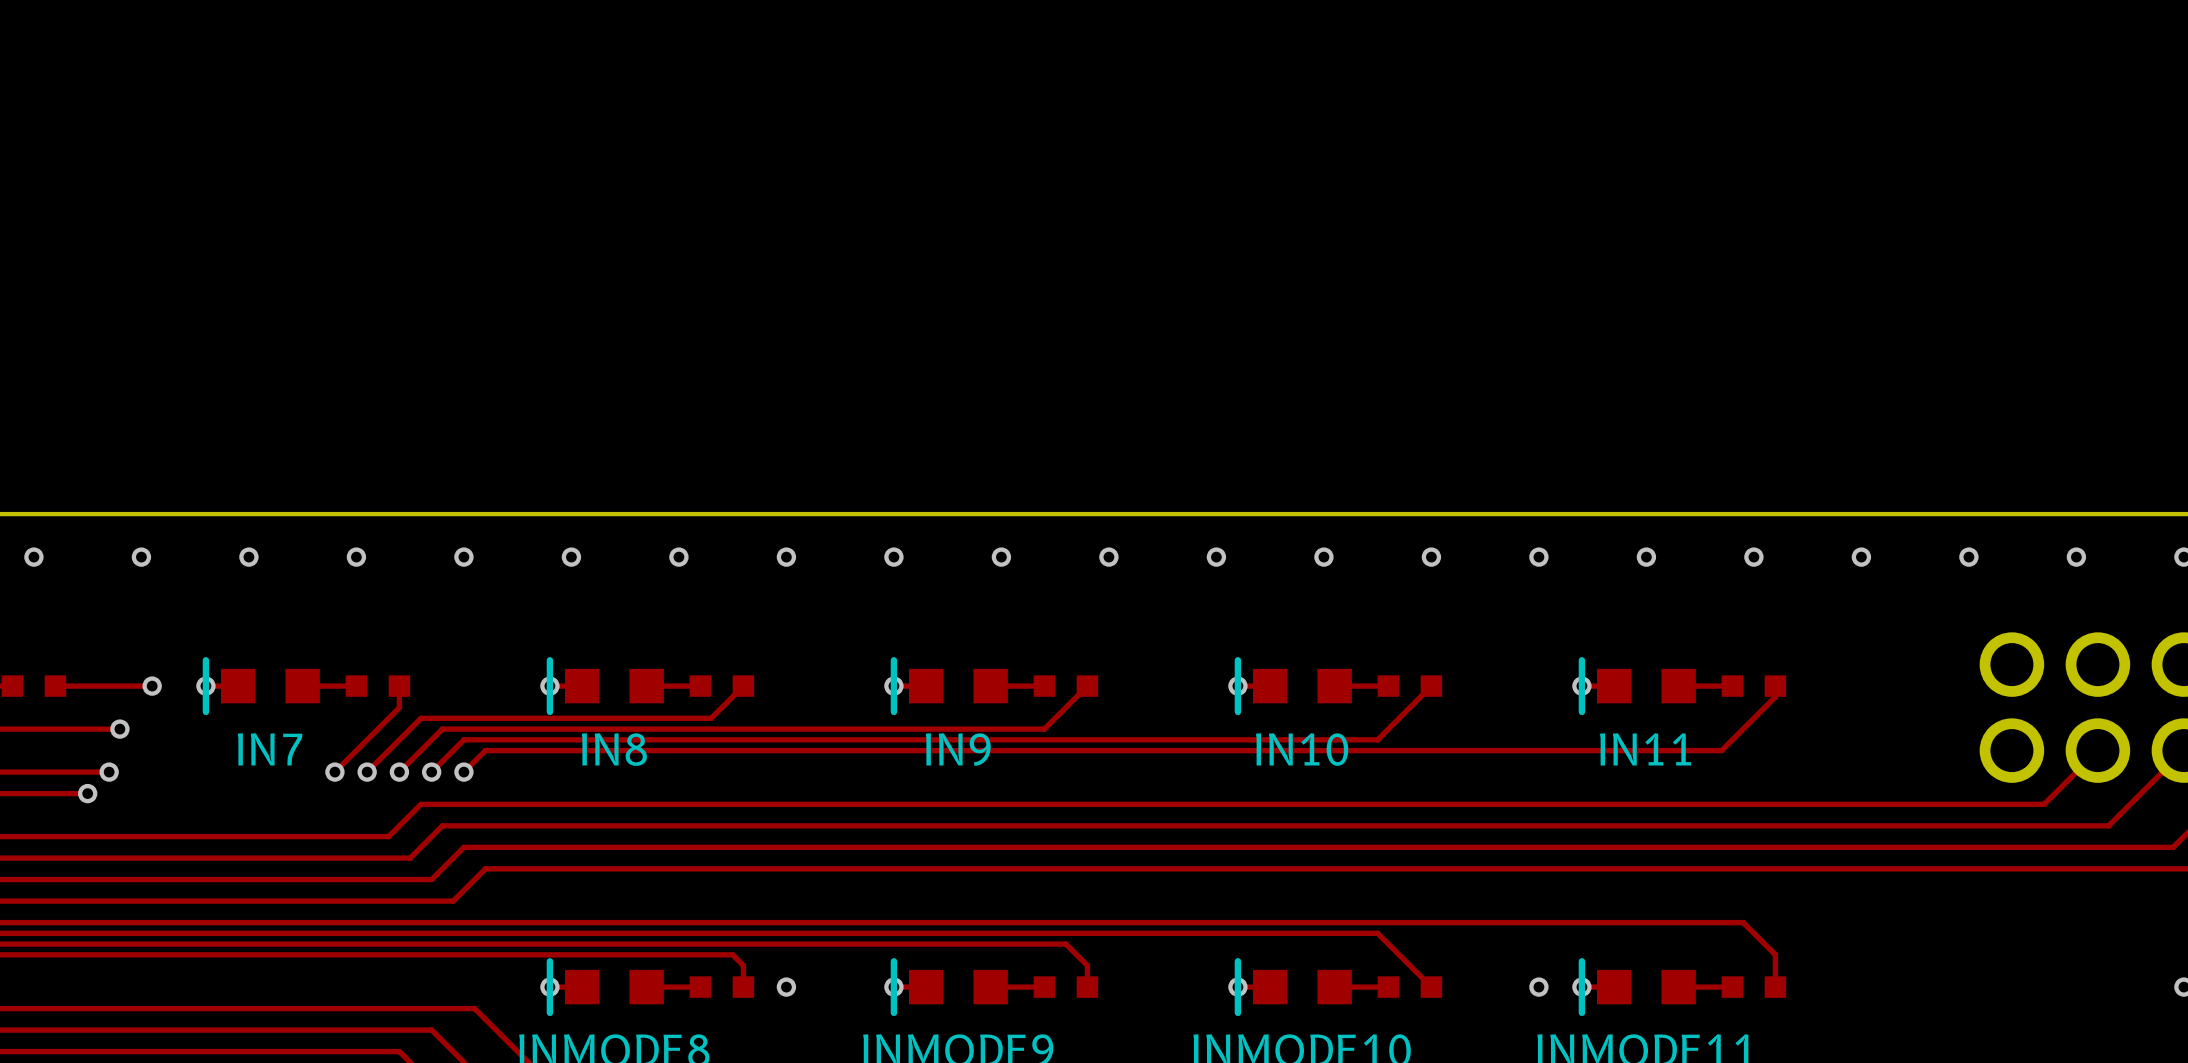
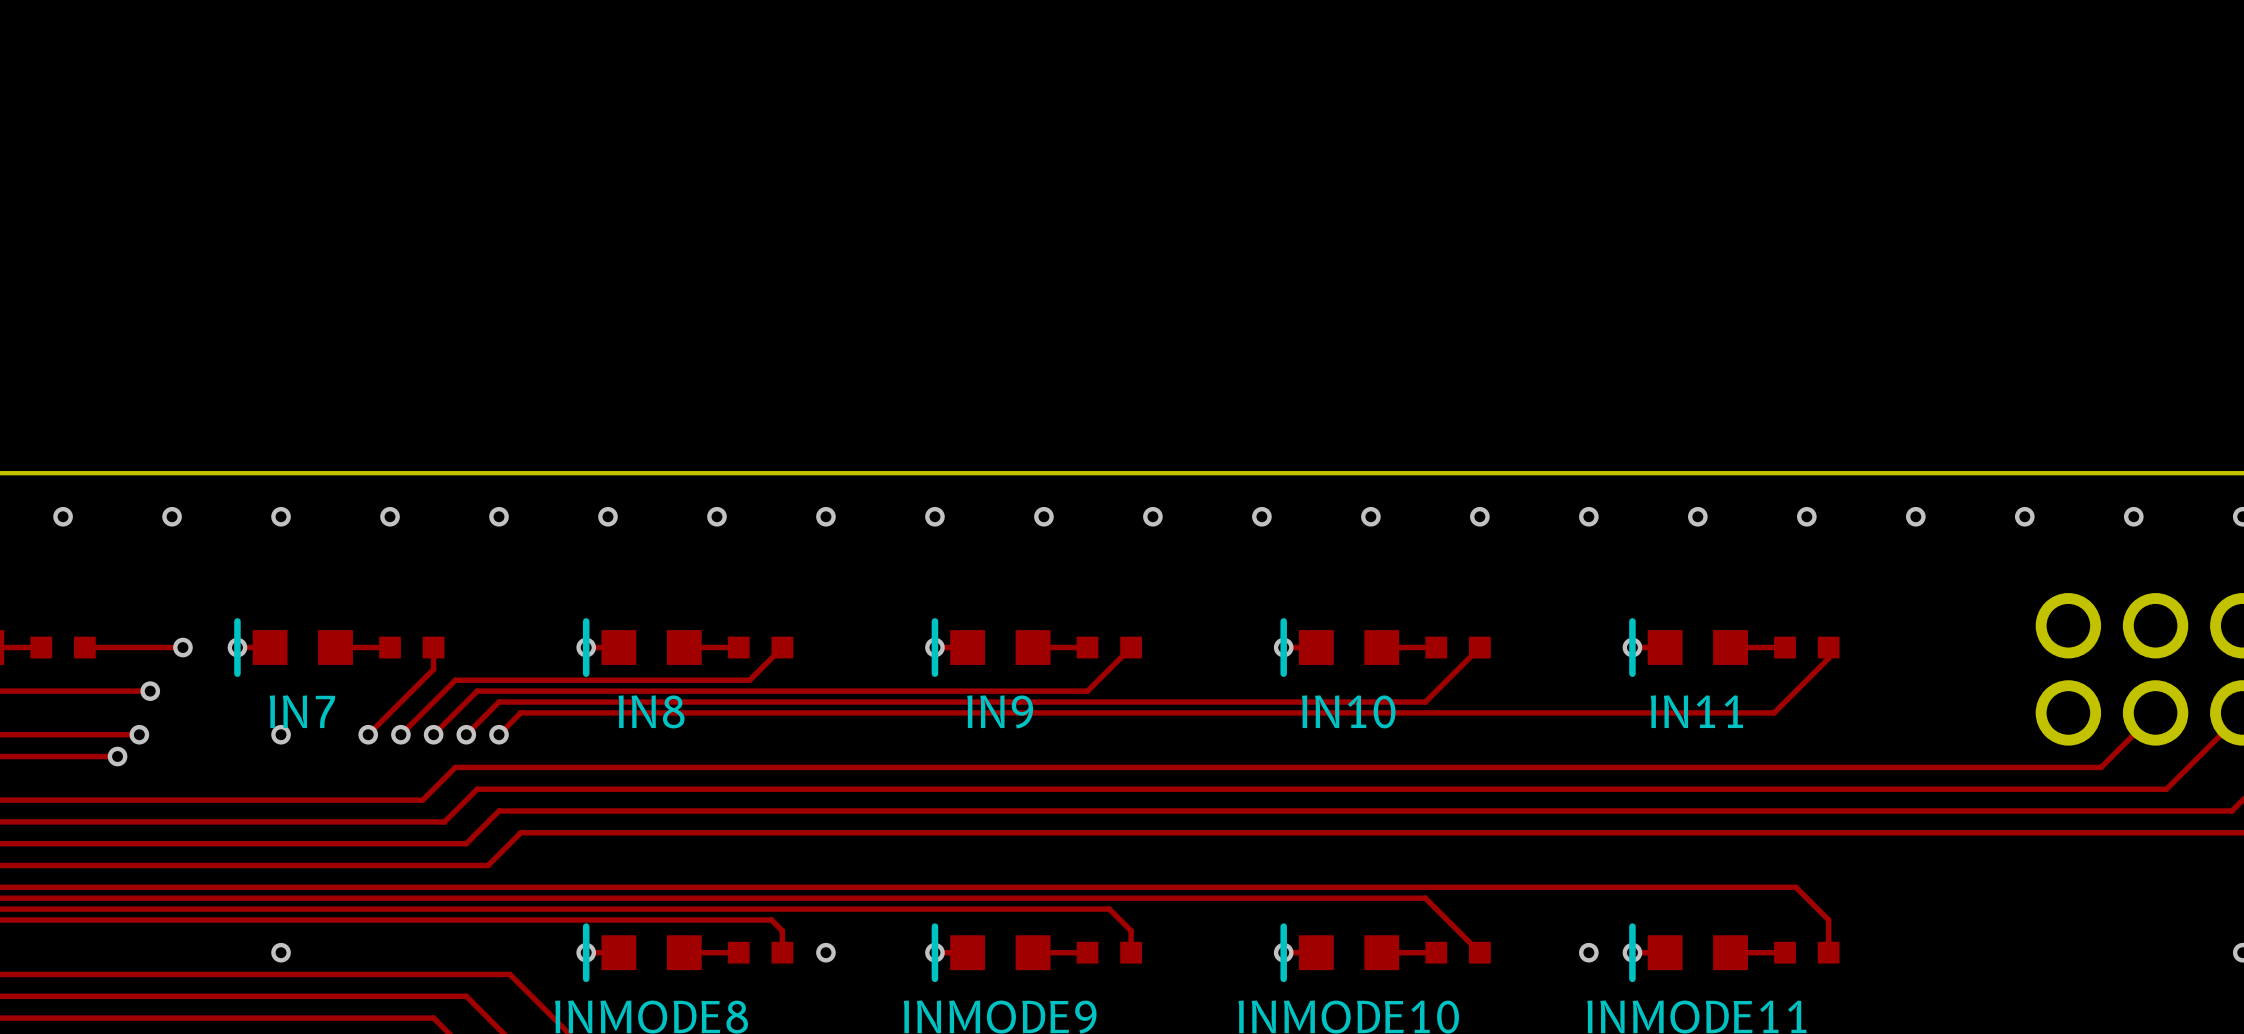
via: none -> (281, 734)
via: none -> (281, 952)

